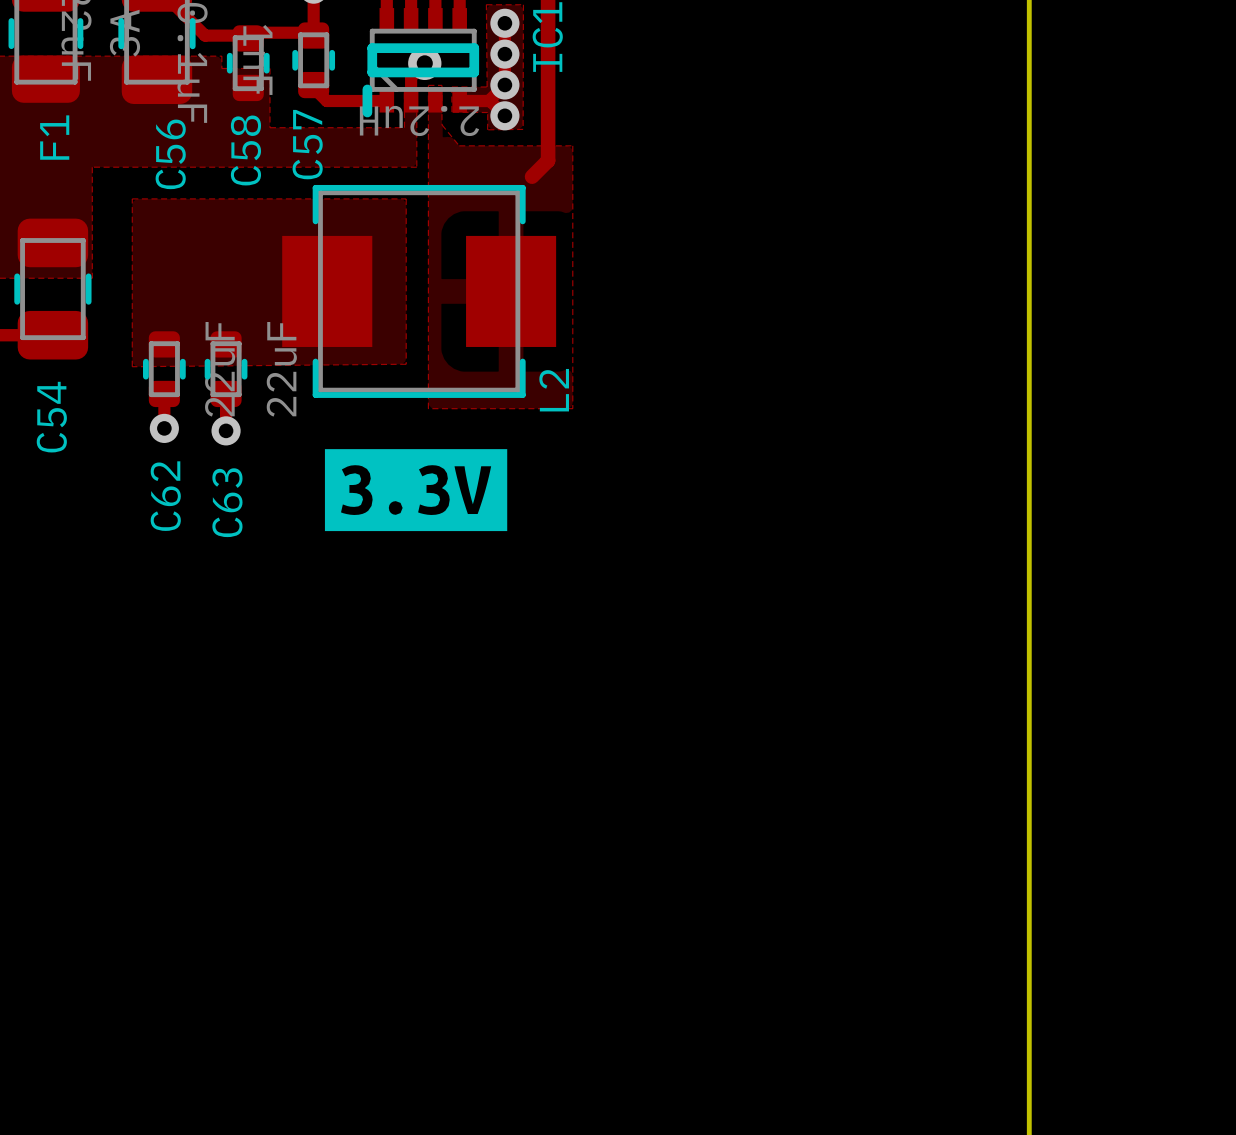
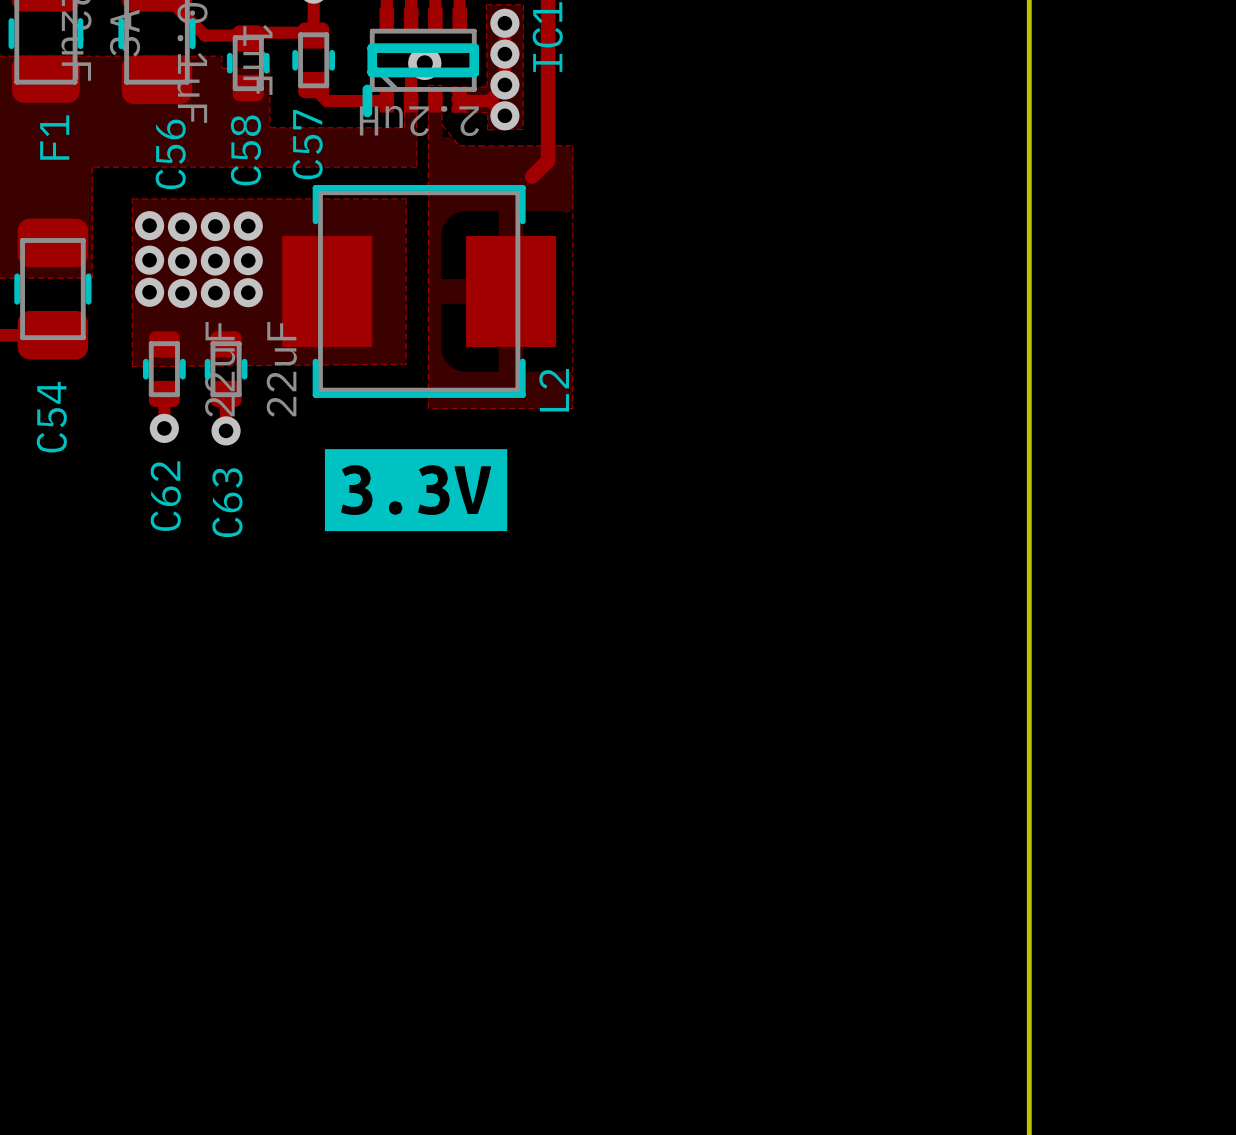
via: none -> (149, 225)
via: none -> (182, 226)
via: none -> (215, 226)
via: none -> (248, 226)
via: none -> (149, 260)
via: none -> (248, 260)
via: none -> (182, 261)
via: none -> (215, 261)
via: none -> (149, 292)
via: none -> (248, 292)
via: none -> (182, 293)
via: none -> (215, 293)

